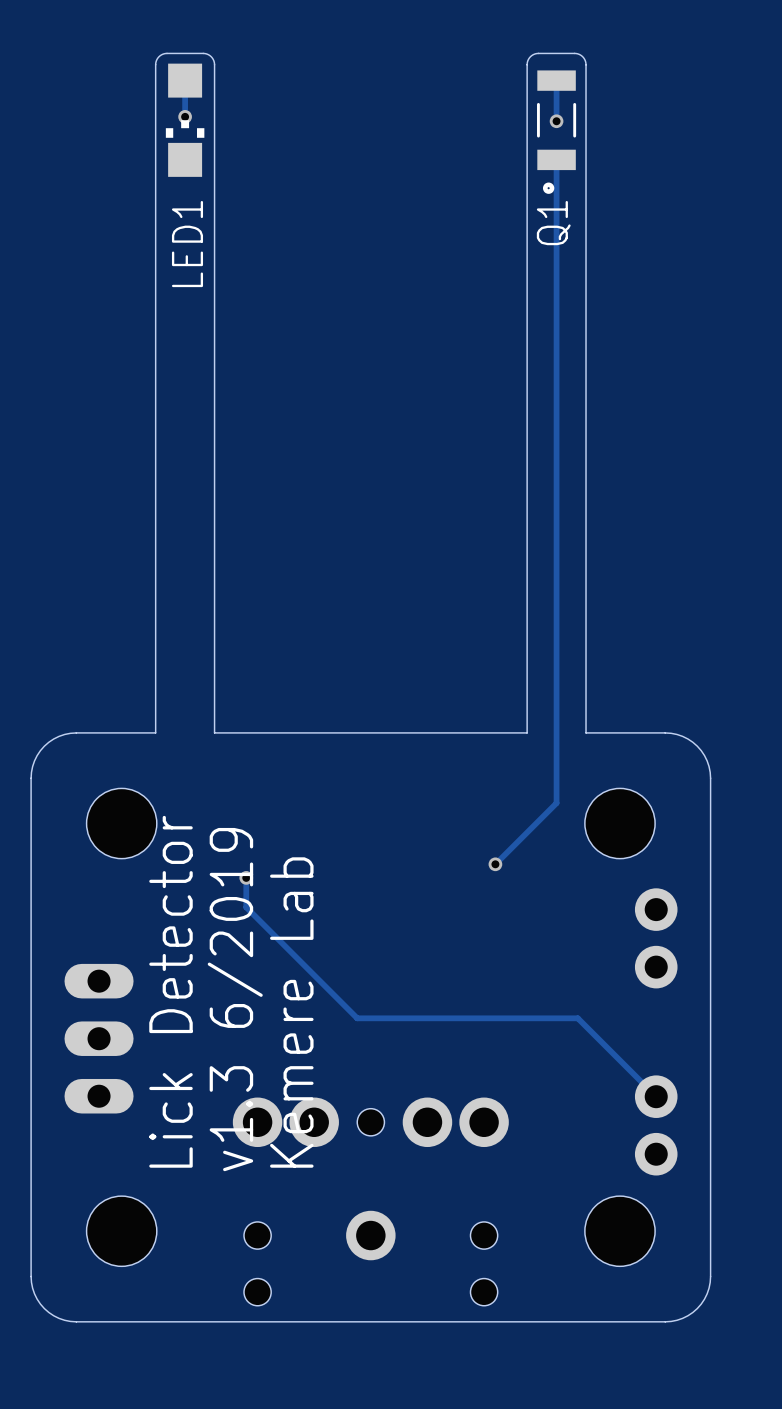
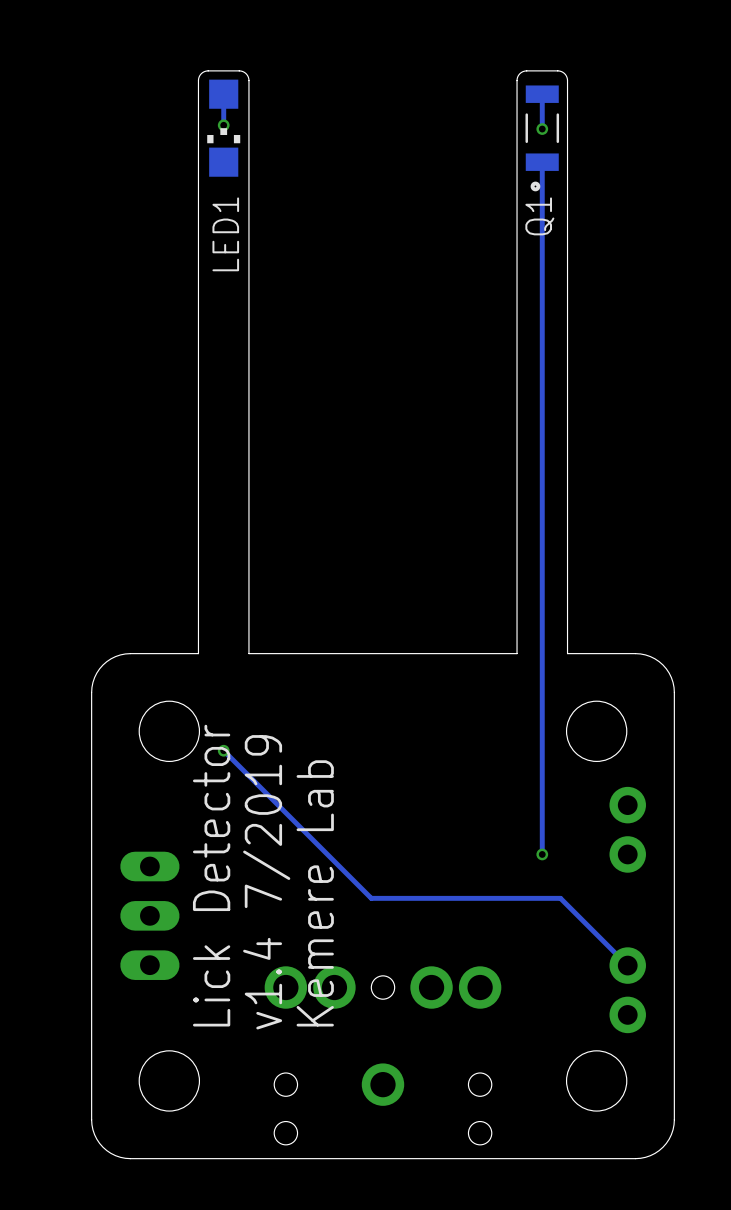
track: (556, 803) (495, 864) -> (542, 713) (542, 854)
via position: (495, 864) -> (542, 854)
track: (246, 877) (246, 907) -> (223, 750) (276, 803)
via position: (246, 877) -> (223, 750)
text: v1.3 6/2019 (235, 999) -> v1.4 7/2019 (266, 882)

